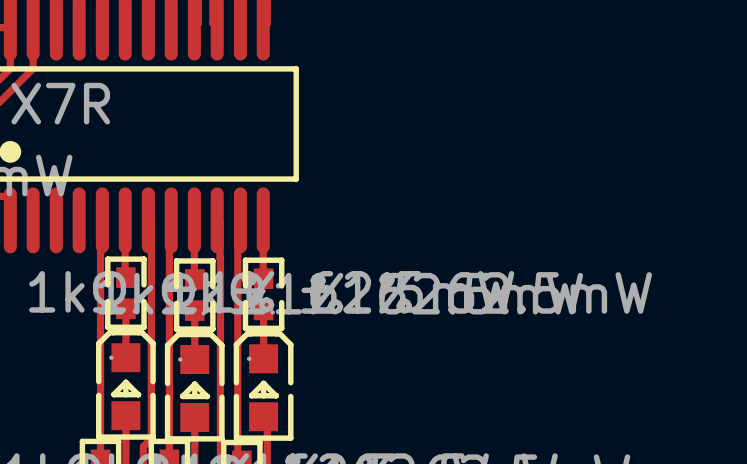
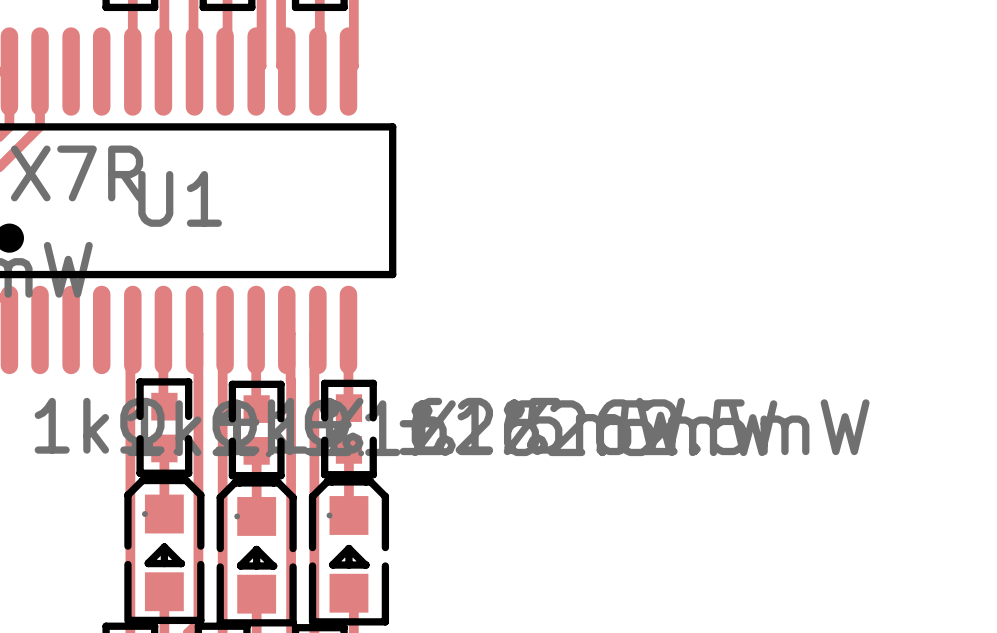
U1 name: none -> U1 (180, 198)

